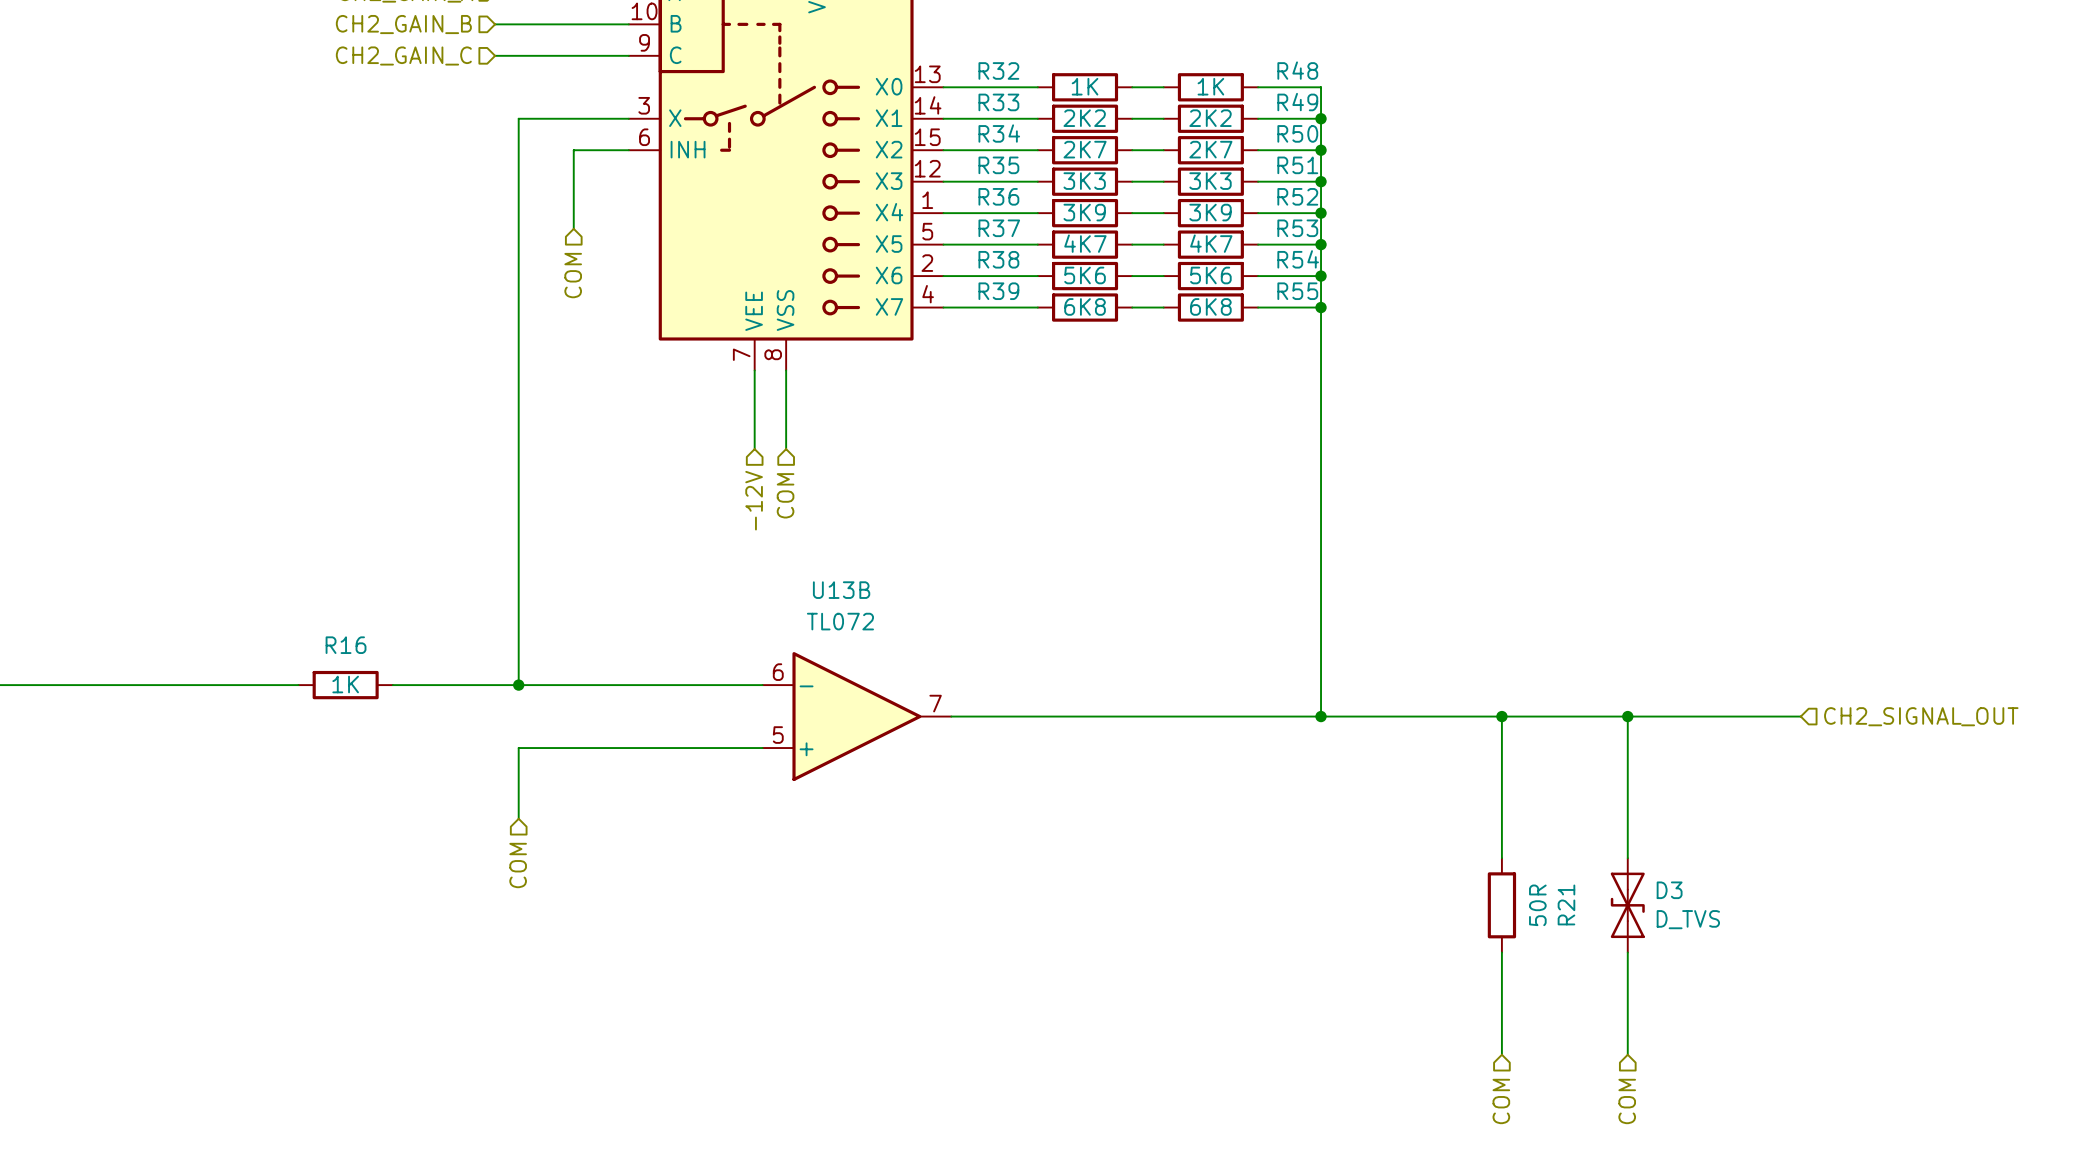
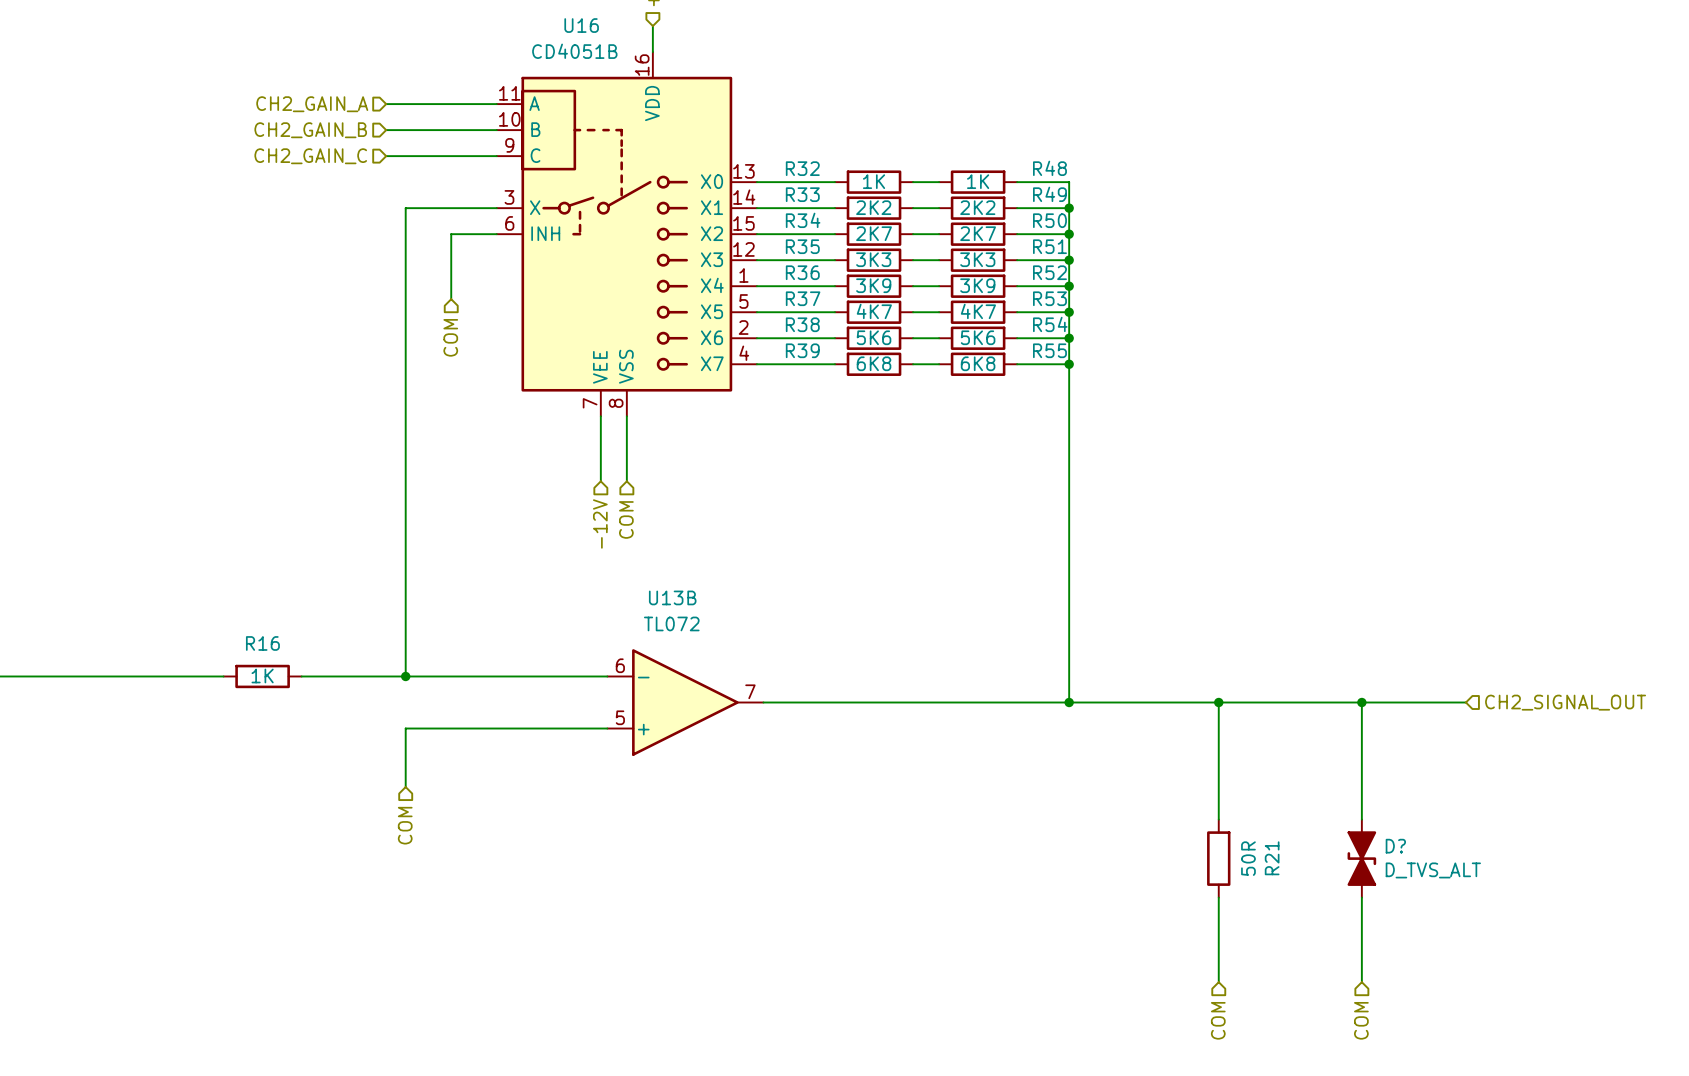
wire: (1627, 716) (1627, 858) -> (1361, 702) (1361, 819)
junction position: (1627, 716) -> (1361, 702)
D3: D_TVS (1627, 905) -> none
D?: none -> D_TVS_ALT (1361, 858)
wire: (1627, 952) (1627, 1054) -> (1361, 897) (1361, 982)
hierarchical label position: COM (1627, 1101) -> COM (1361, 1020)

